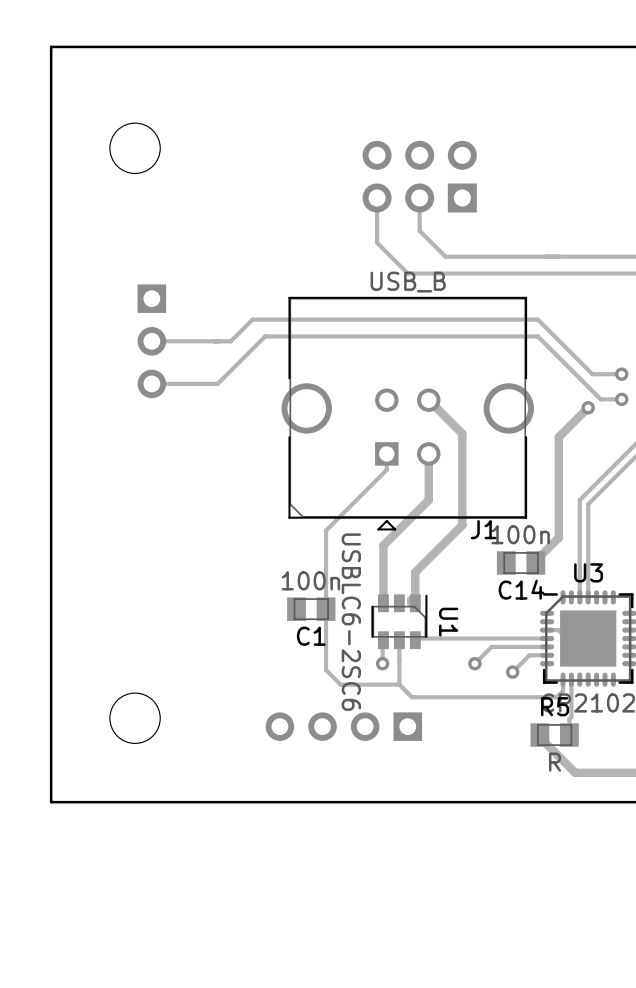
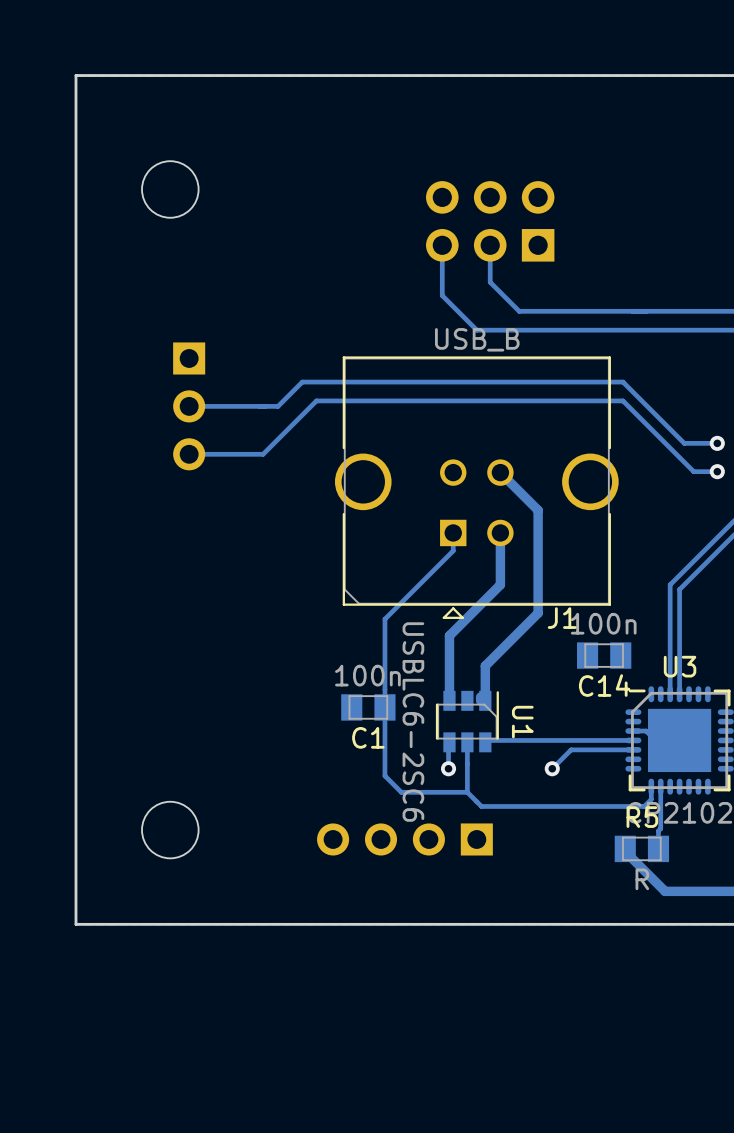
track: (588, 407) (558, 437) (558, 537) (535, 560) (535, 563) -> none
via: (588, 407) -> none
track: (547, 655) (529, 655) (512, 672) -> none
via: (512, 672) -> none

